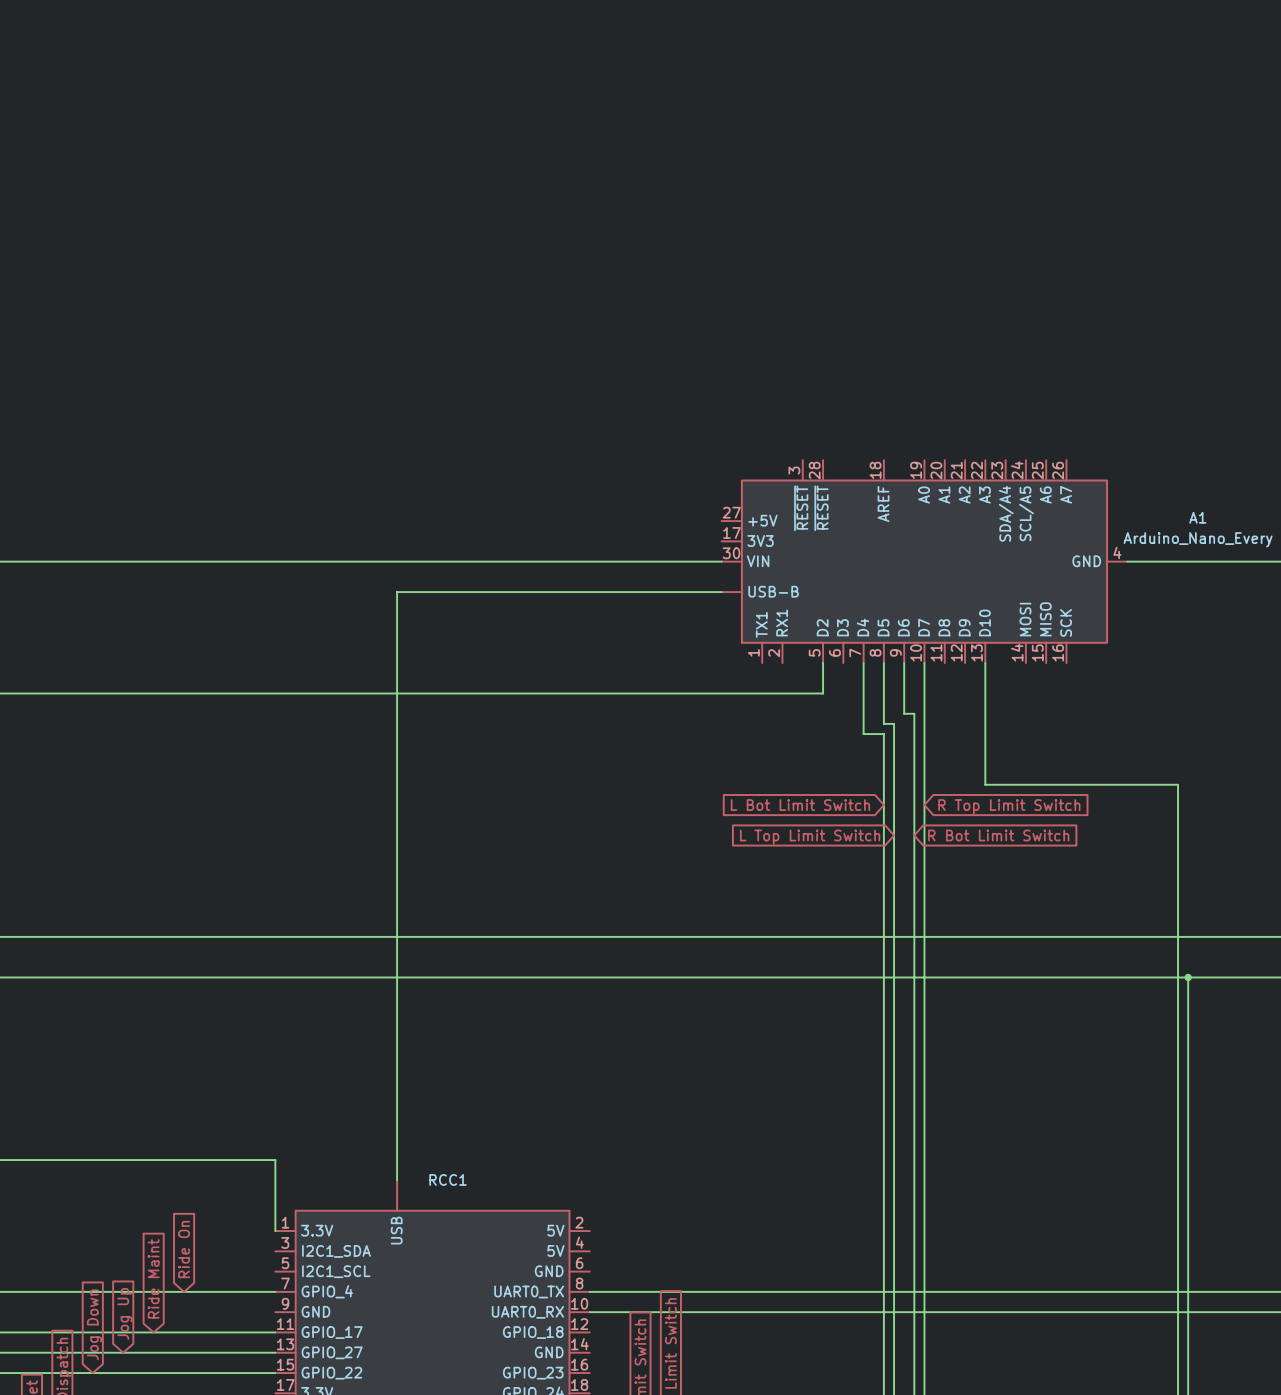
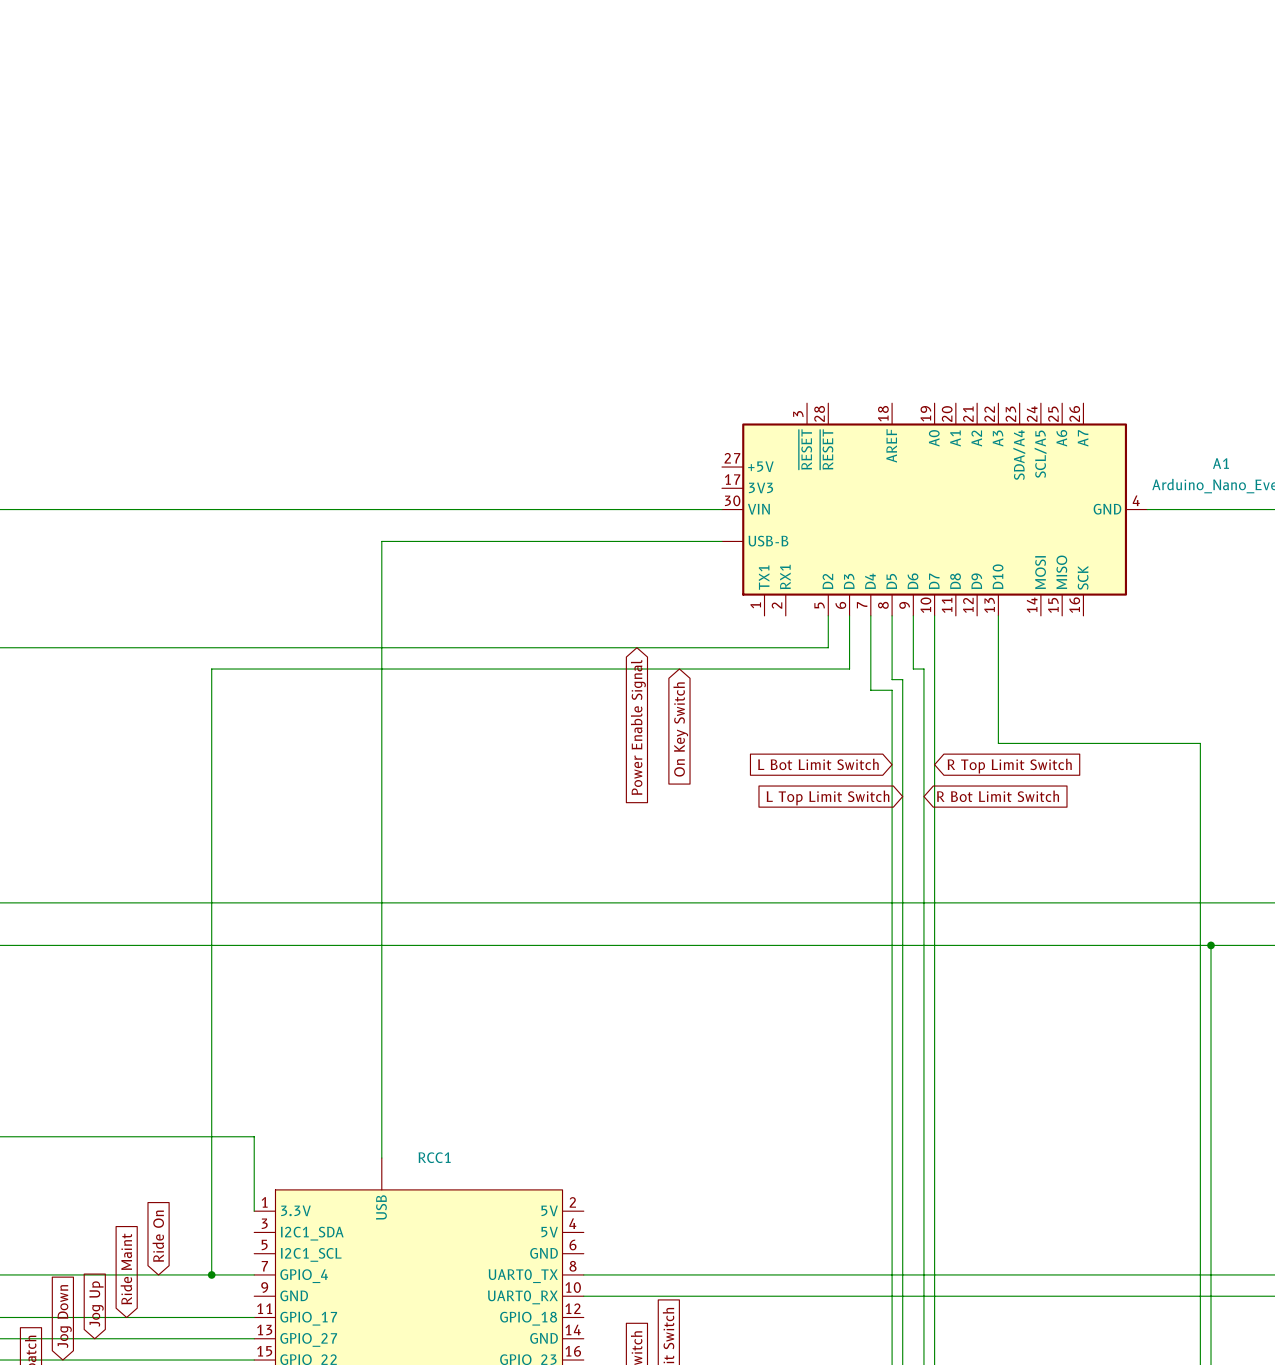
wire: none -> (849, 615) (849, 669) (211, 669) (211, 1274)
global label: none -> On Key Switch (680, 729)
global label: none -> Power Enable Signal (638, 727)
junction: none -> (211, 1274)

